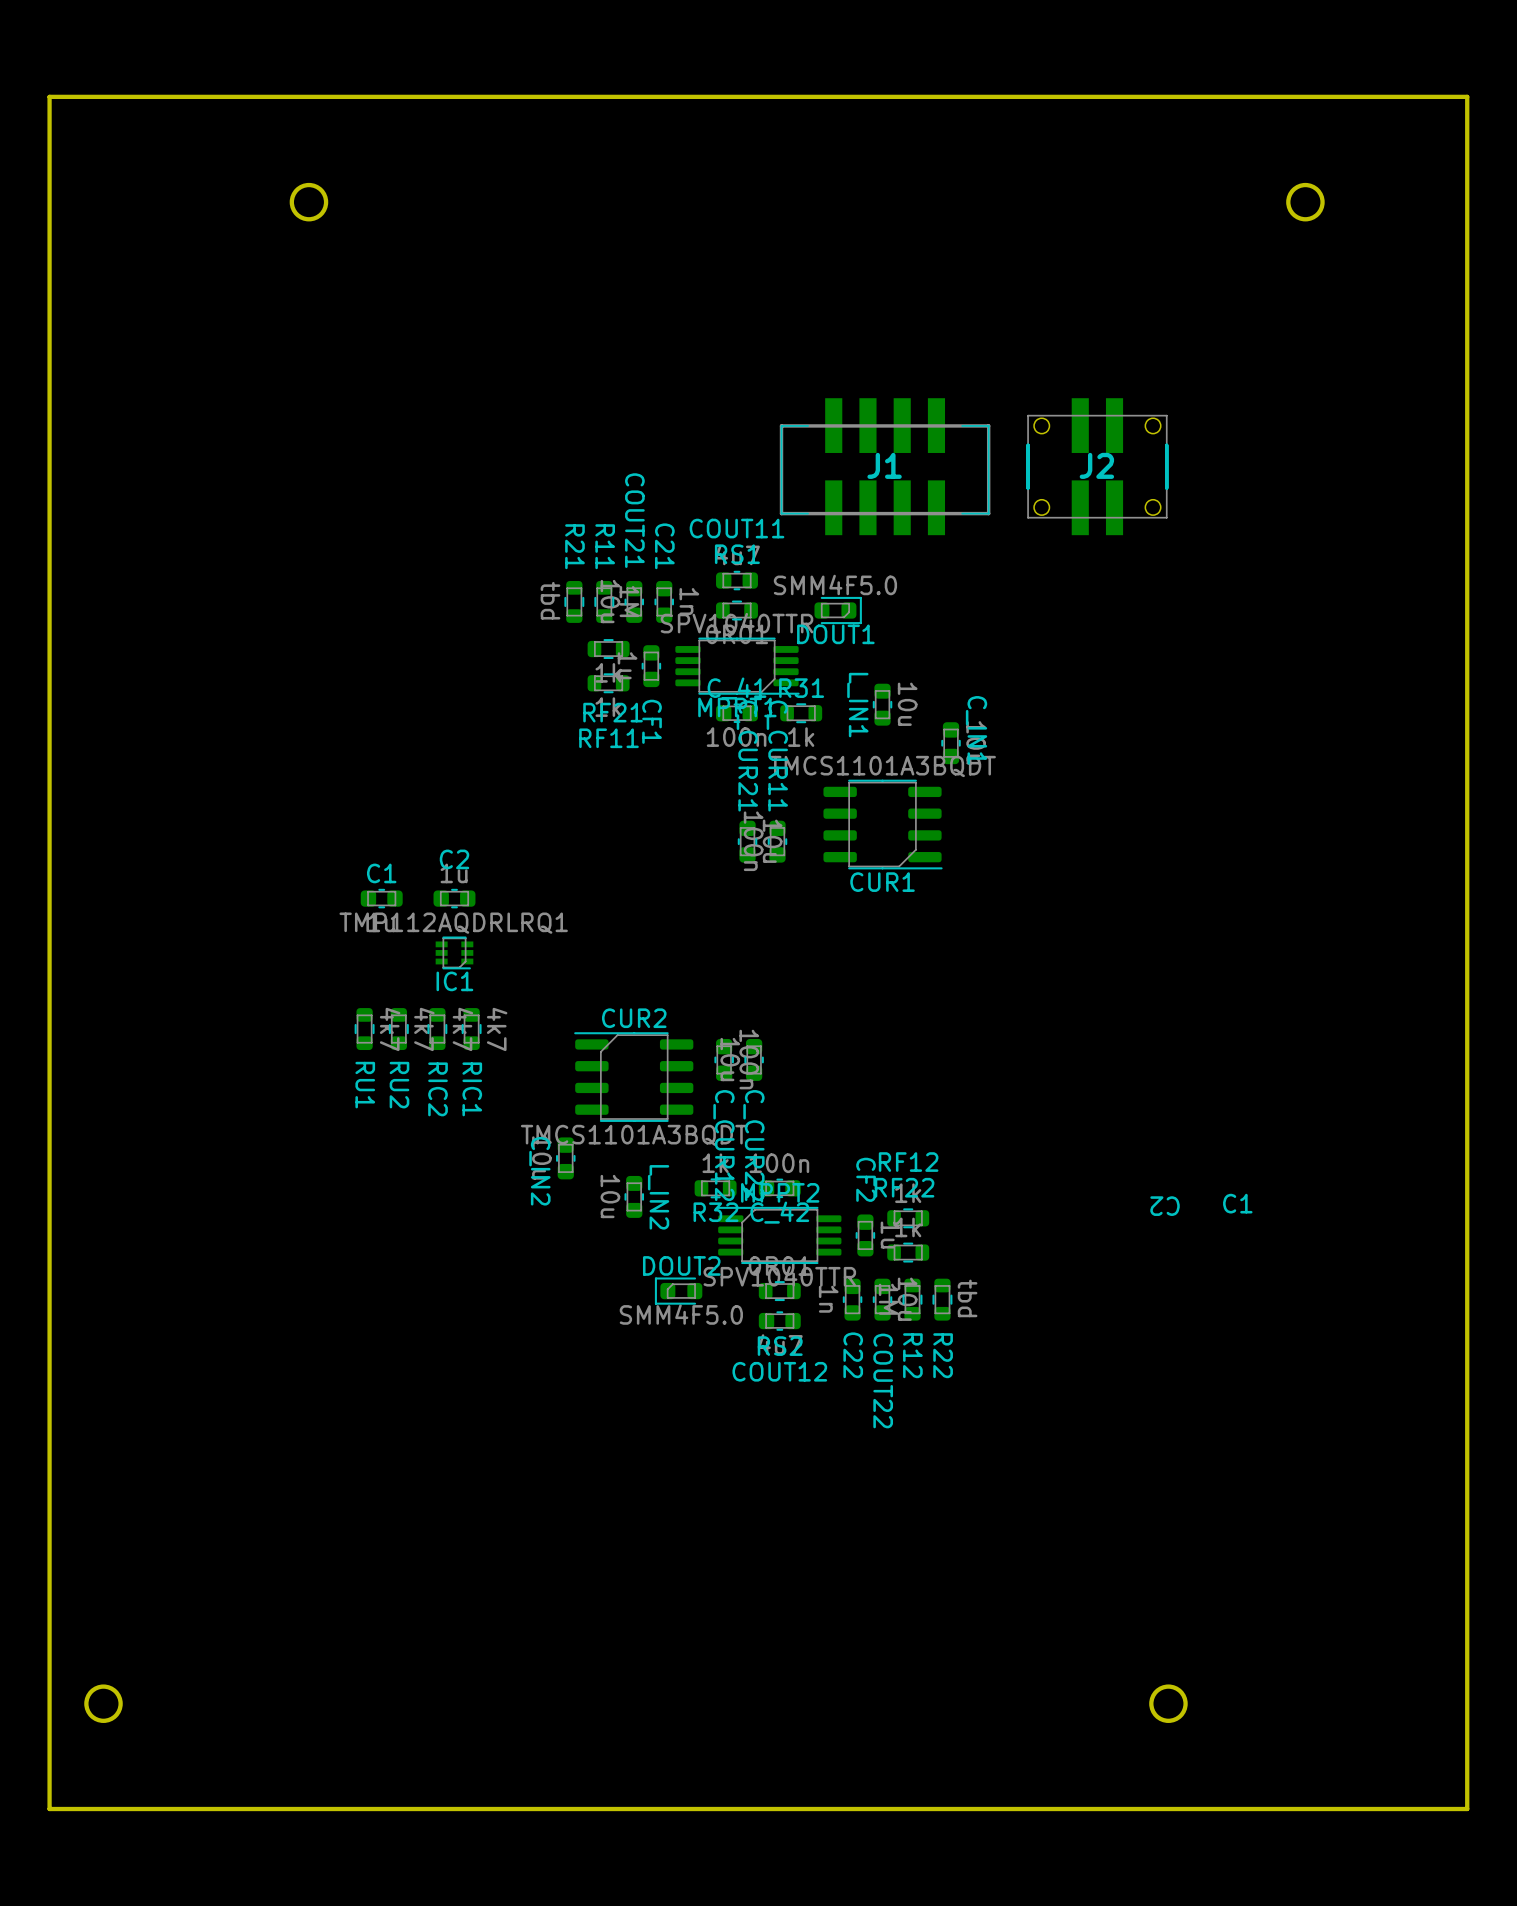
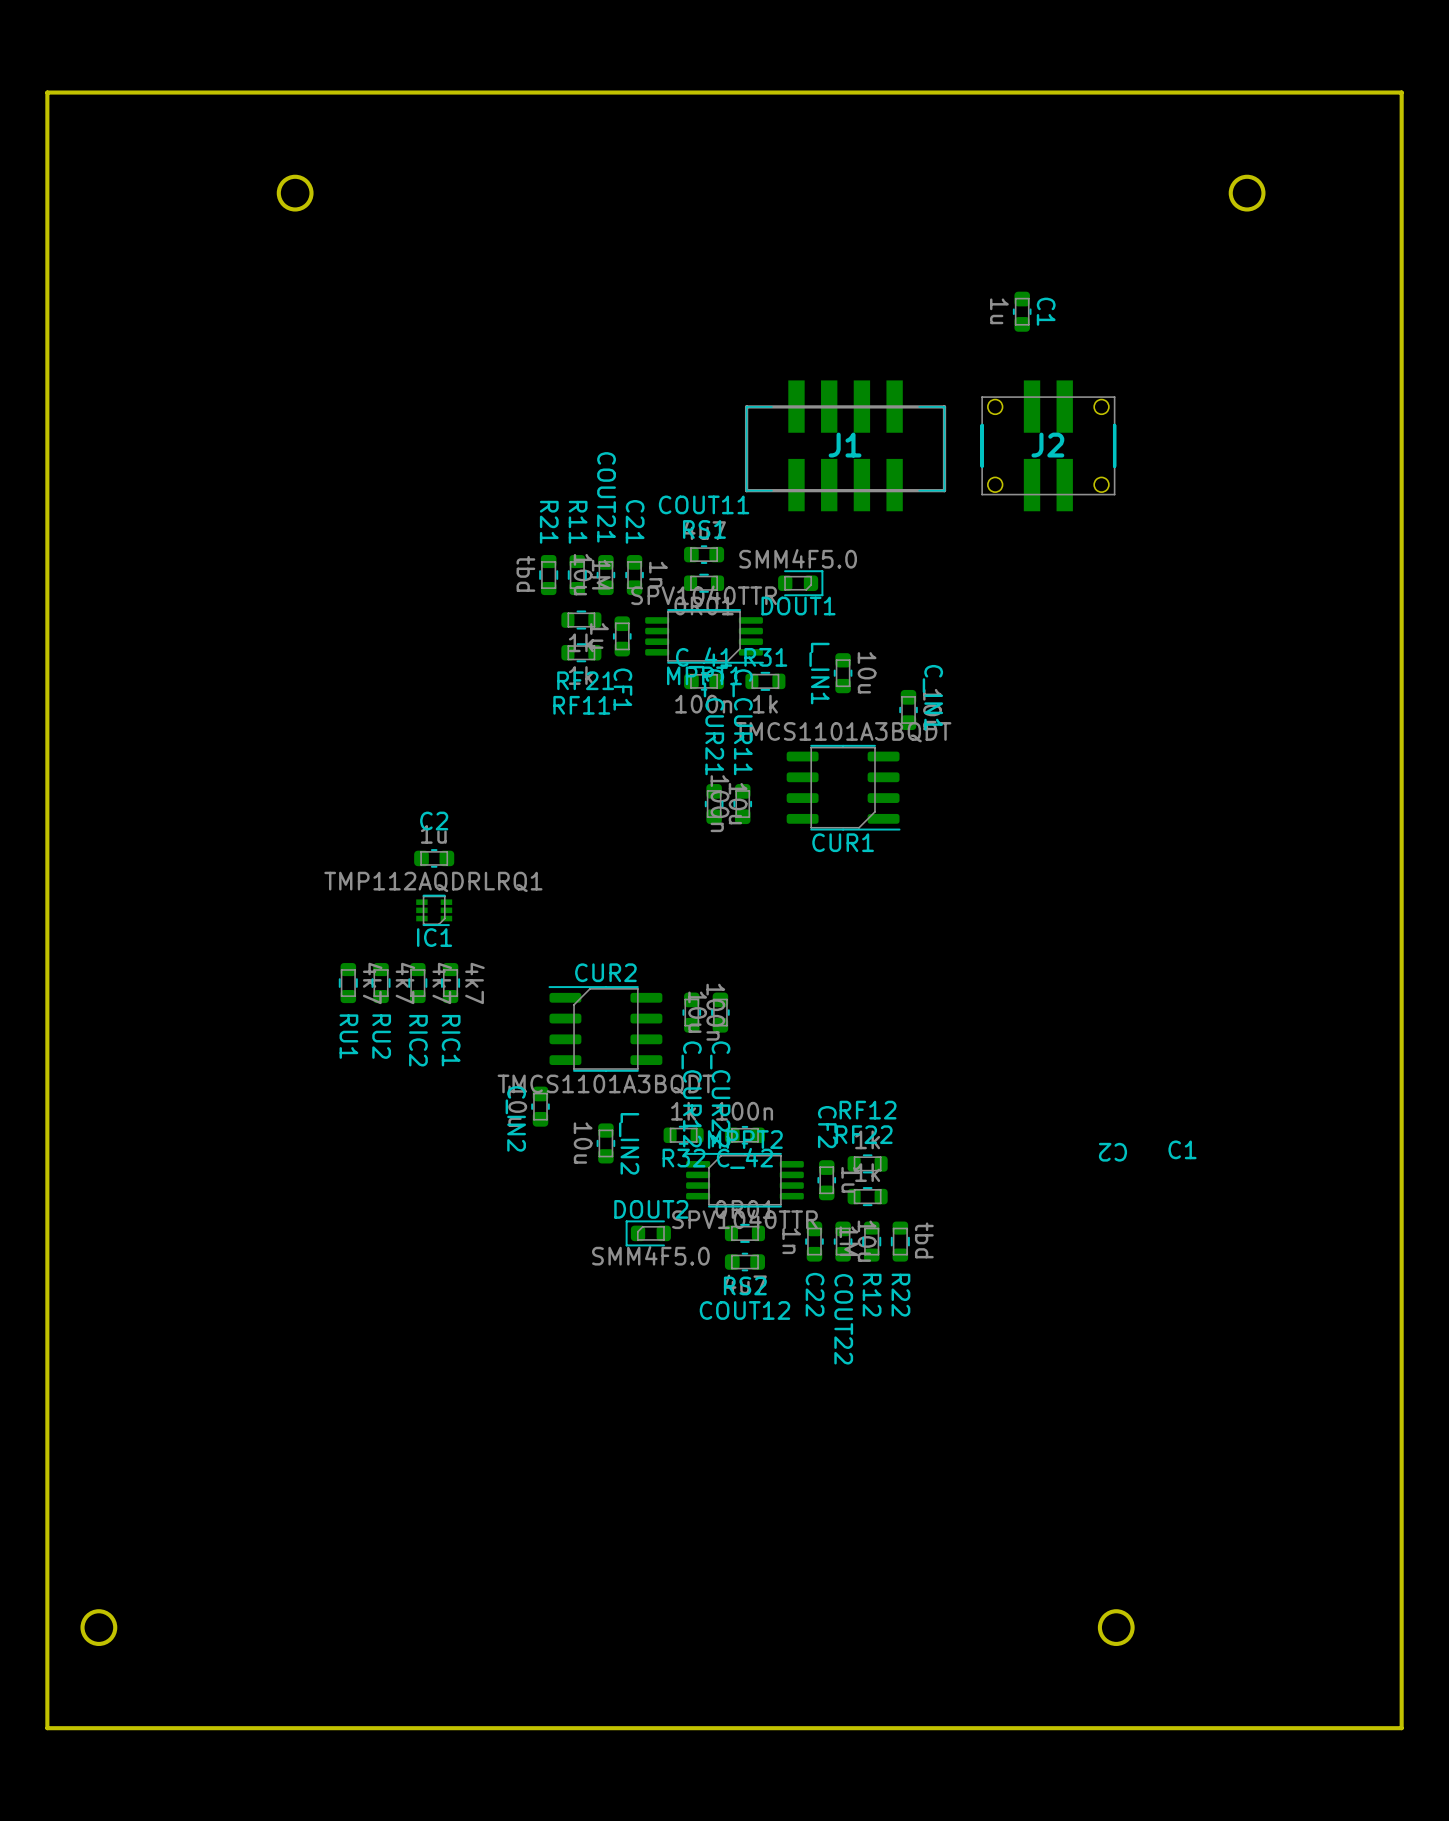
C1 rotation: 0° (381, 898) -> 90° clockwise (1022, 311)
C1 position: (381, 898) -> (1022, 311)

